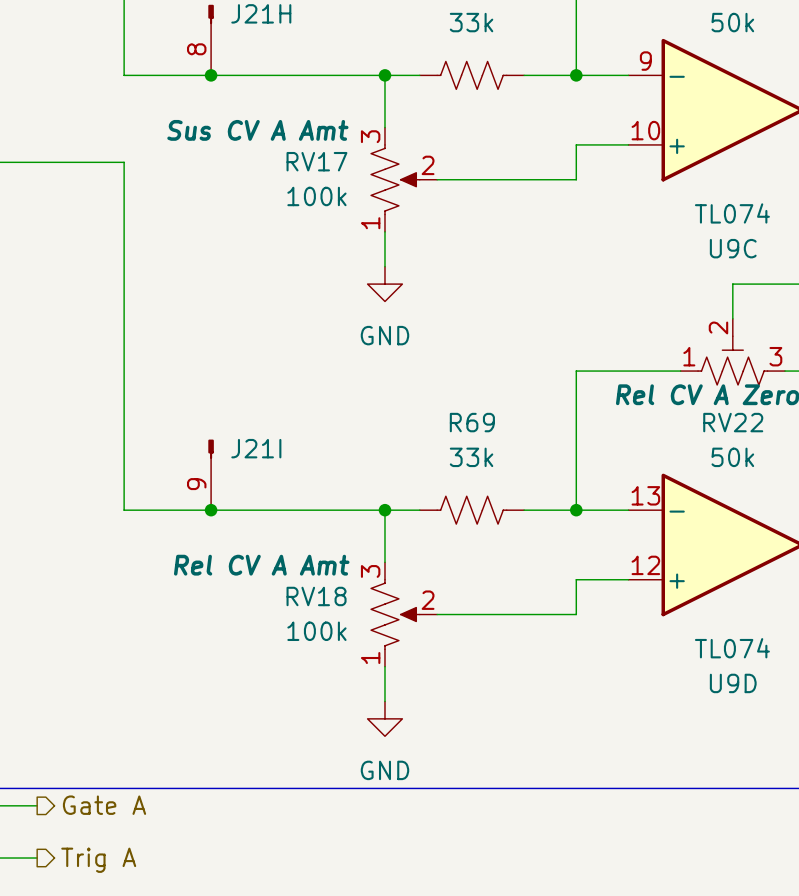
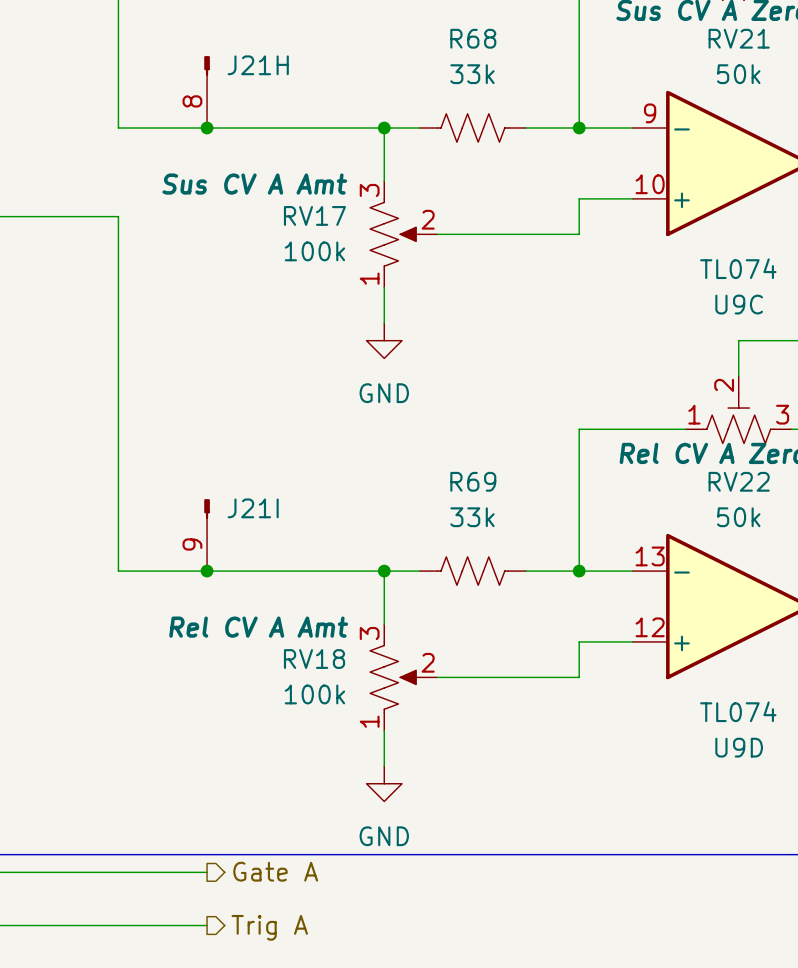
wire: none -> (29, 872) (207, 872)
hierarchical label position: Gate A (104, 805) -> Gate A (275, 871)
wire: none -> (29, 925) (207, 925)
hierarchical label position: Trig A (98, 860) -> Trig A (269, 927)

